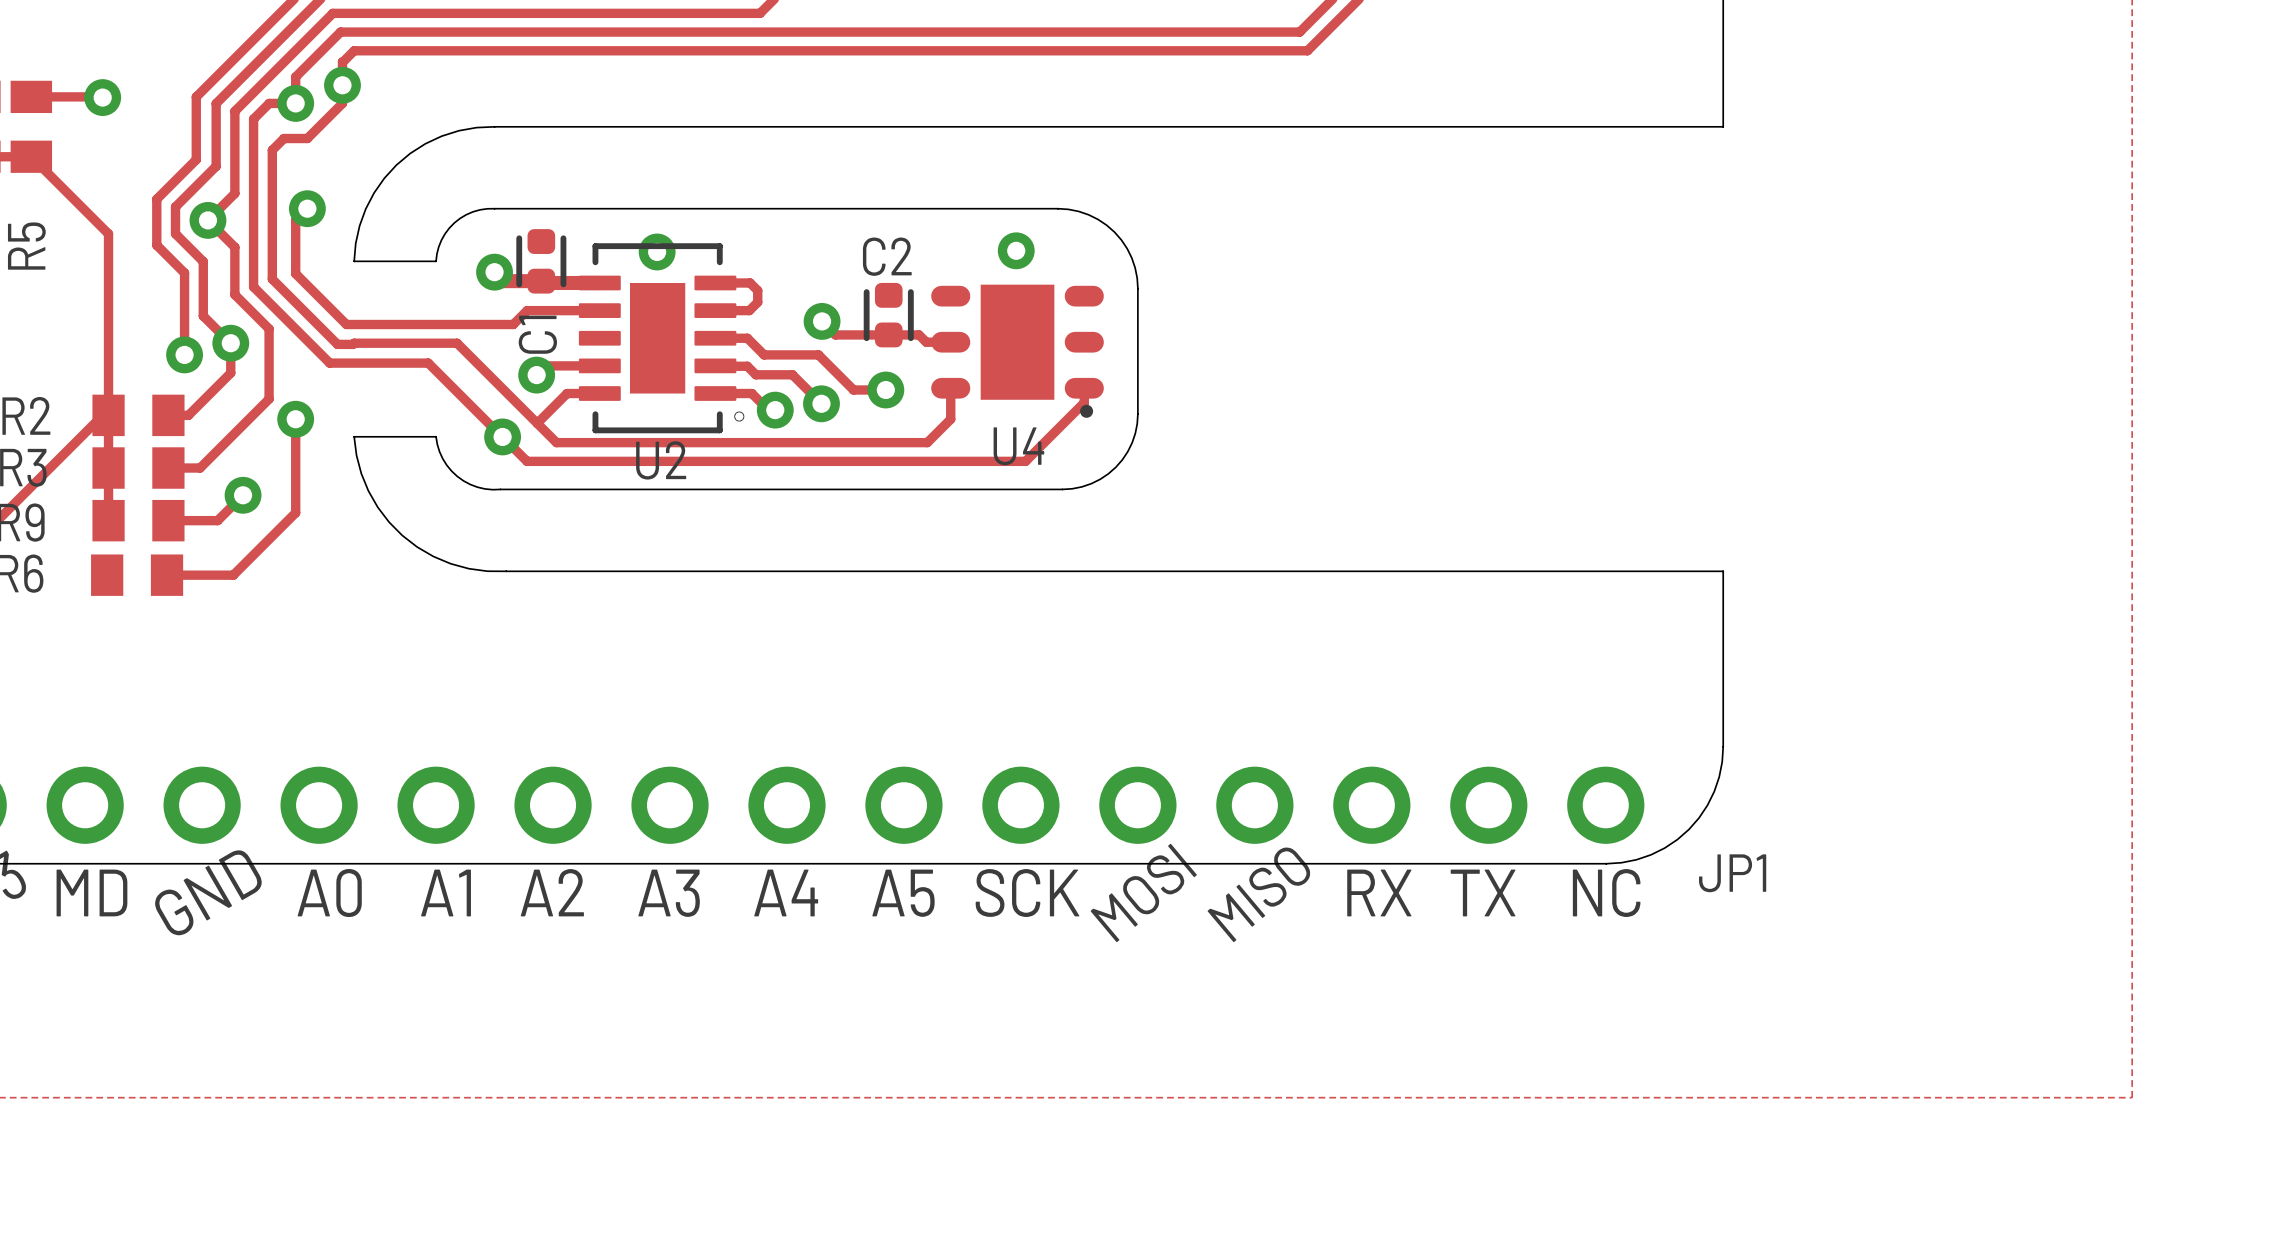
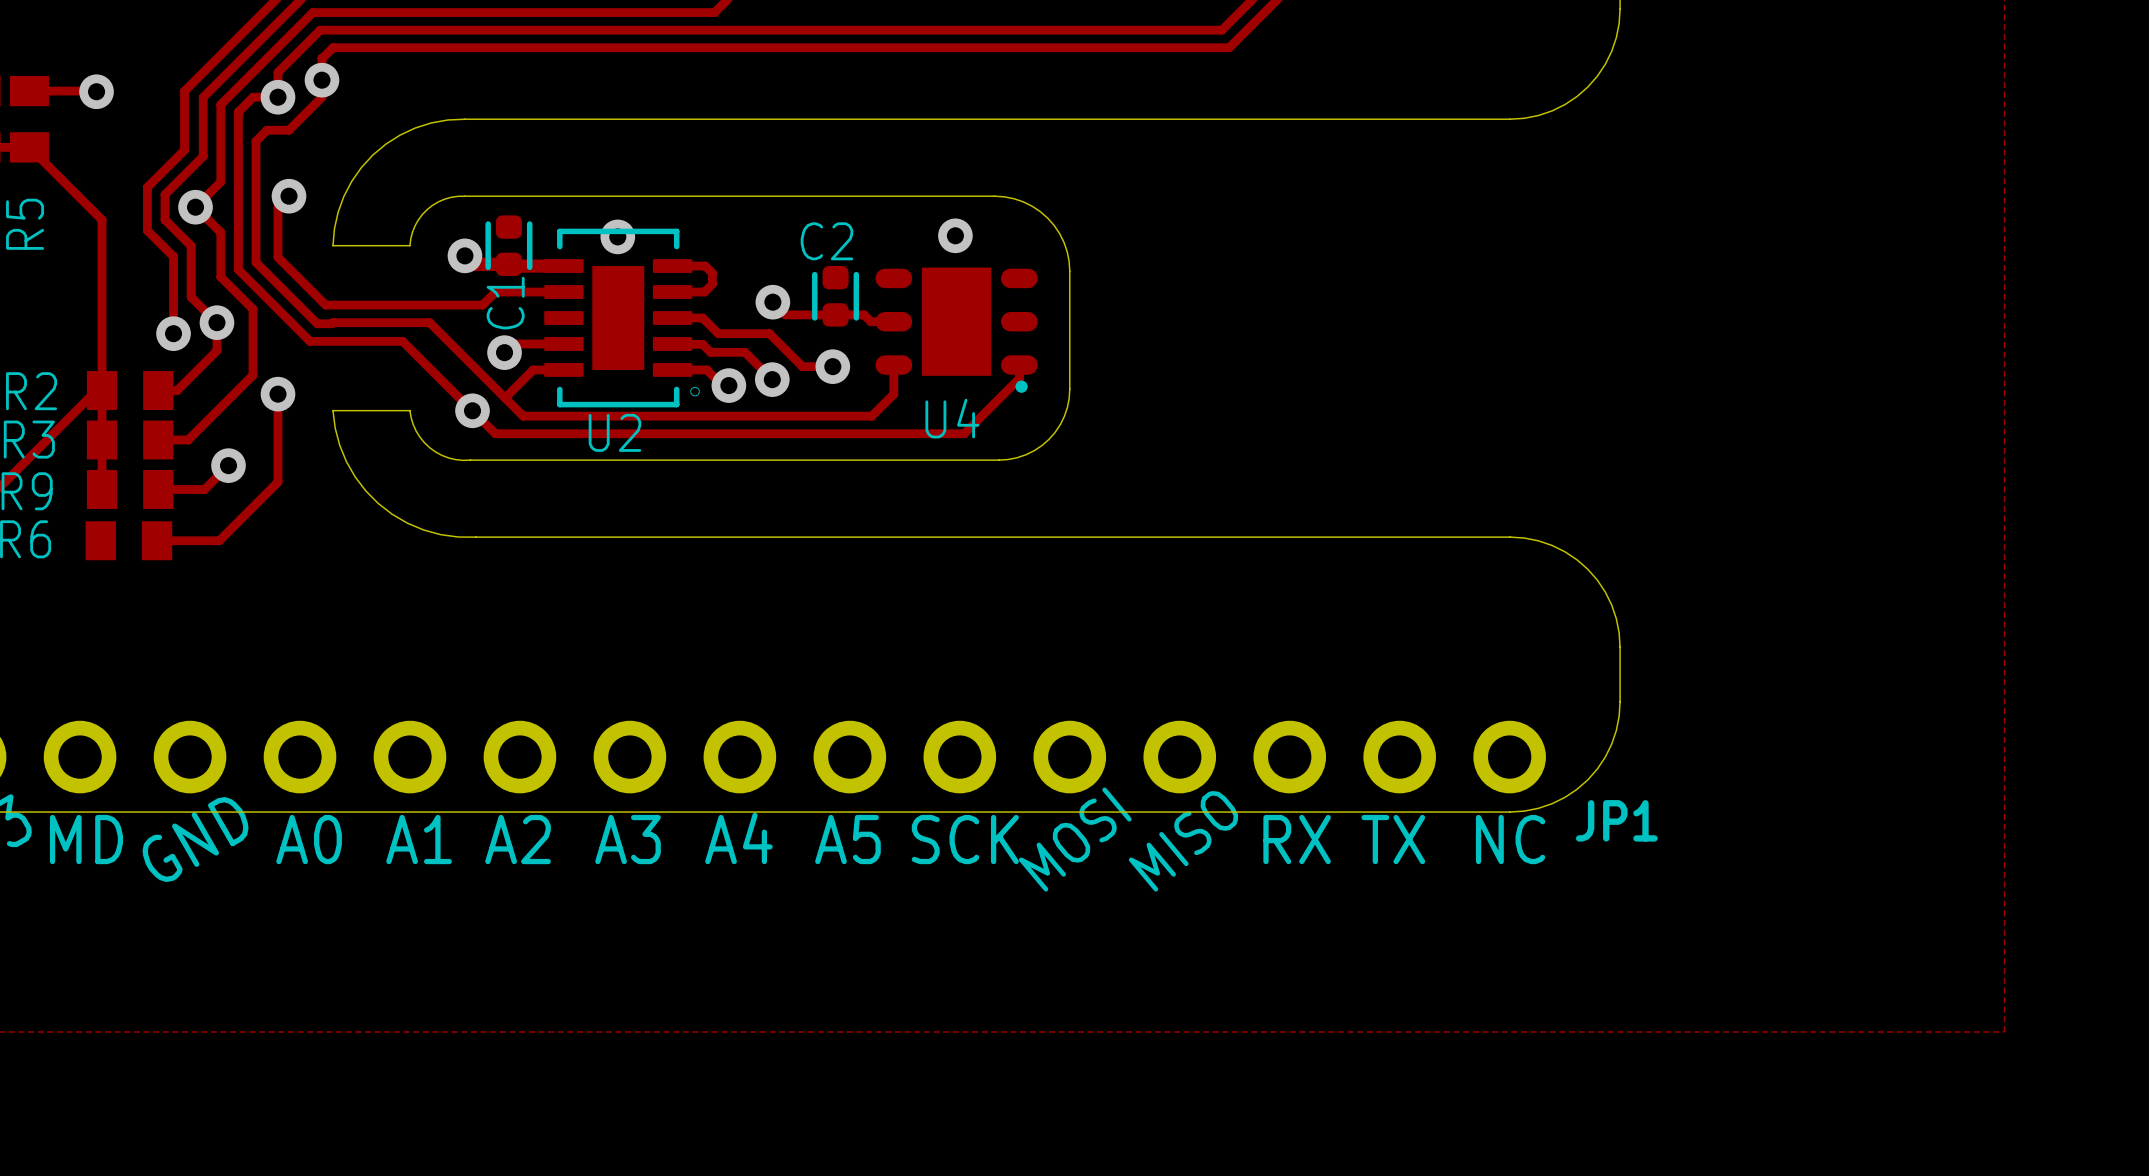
board edge: (1723, 9) (1723, 126) (1606, 126) -> (1620, 9) (1616, 37) (1611, 51) (1597, 76) (1587, 87) (1577, 96) (1552, 110) (1538, 115) (1510, 119)
board edge: (1606, 571) (1723, 571) (1723, 688) -> (1510, 537) (1538, 540) (1552, 545) (1577, 559) (1587, 569) (1597, 580) (1611, 605) (1616, 618) (1620, 647)

